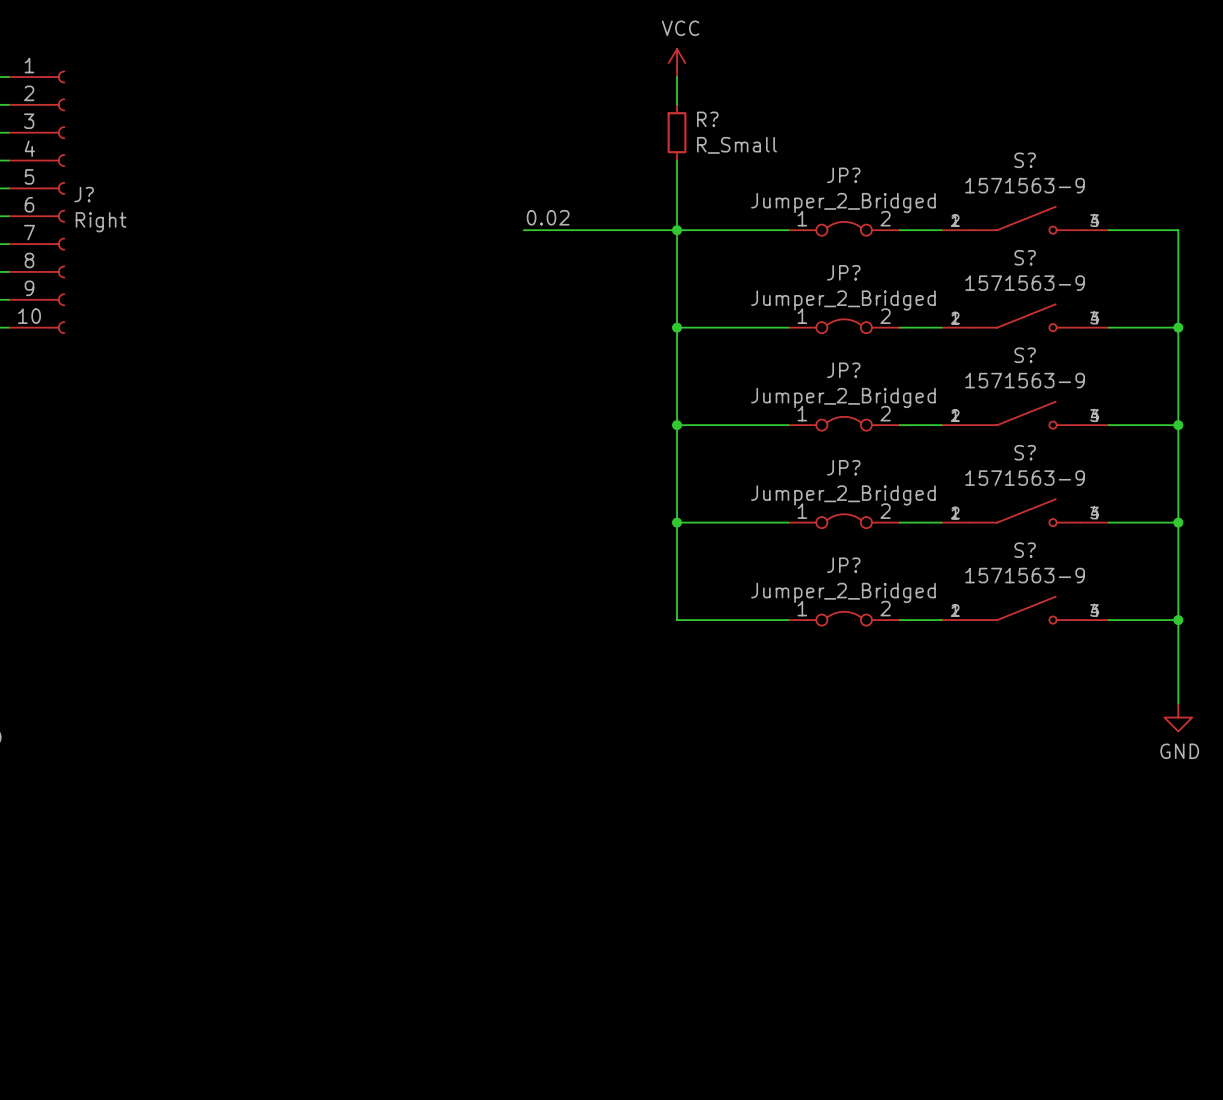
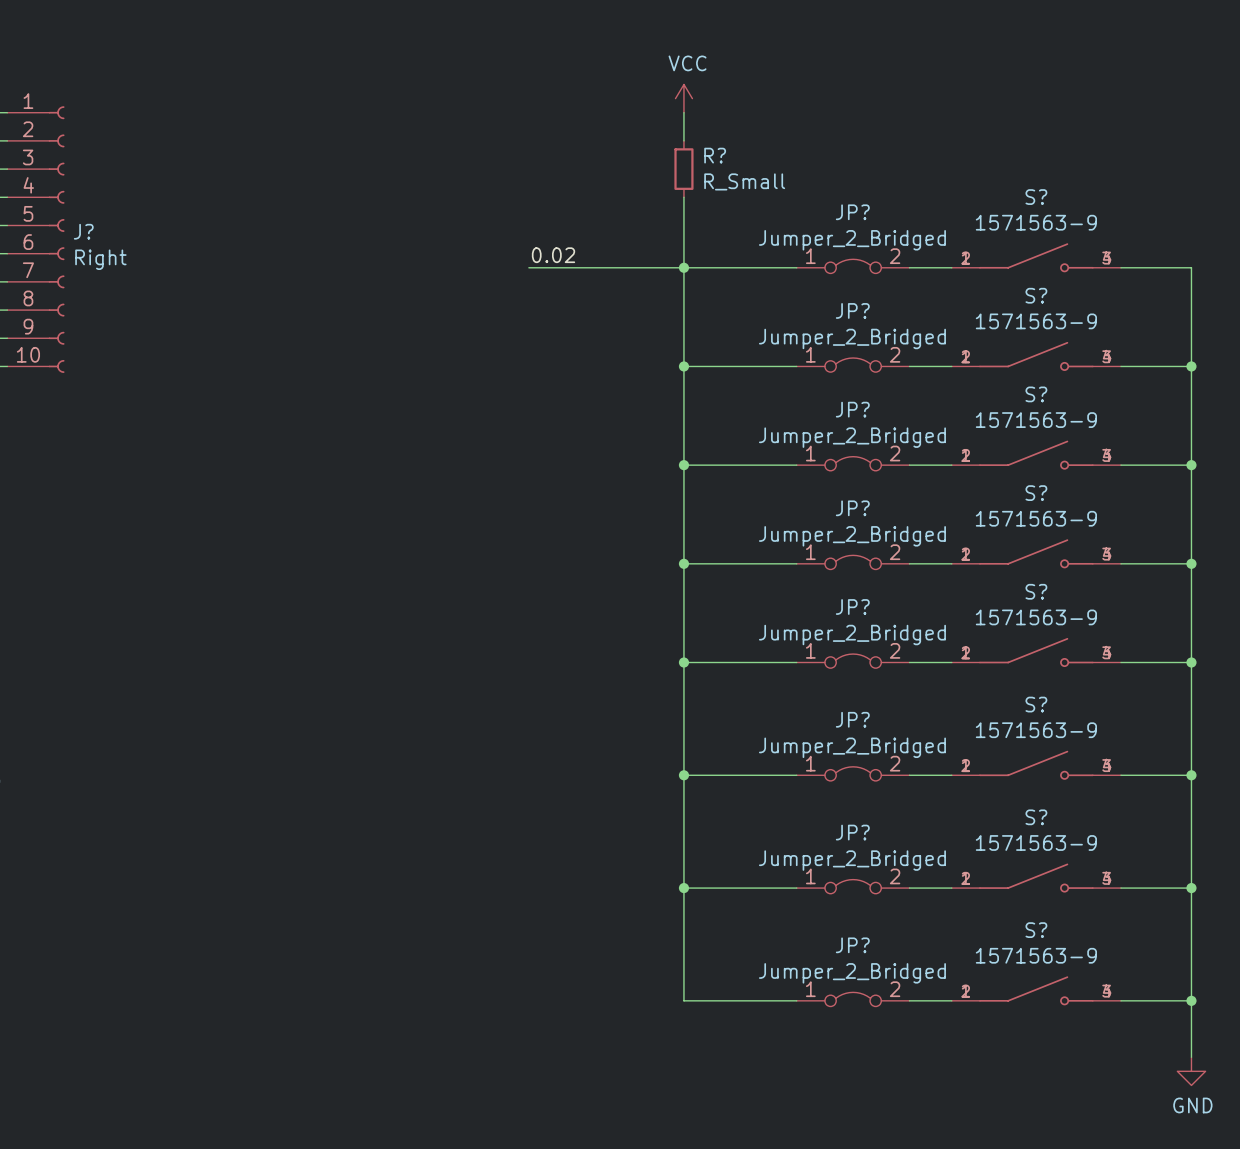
wire: none -> (683, 662) (683, 1000) (796, 1000)
junction: none -> (683, 662)
wire: none -> (1191, 747) (1191, 1057)
power symbol: GND (1178, 717) -> none
S?: none -> 1571563-9 (1036, 765)
JP?: none -> Jumper_2_Bridged (853, 773)
wire: none -> (683, 775) (796, 775)
junction: none -> (683, 775)
wire: none -> (909, 775) (951, 775)
wire: none -> (1120, 775) (1191, 775)
junction: none -> (1191, 775)
S?: none -> 1571563-9 (1036, 878)
JP?: none -> Jumper_2_Bridged (853, 886)
wire: none -> (683, 888) (796, 888)
junction: none -> (683, 888)
wire: none -> (909, 888) (951, 888)
wire: none -> (1120, 888) (1191, 888)
junction: none -> (1191, 888)
S?: none -> 1571563-9 (1036, 990)
JP?: none -> Jumper_2_Bridged (853, 999)
wire: none -> (909, 1000) (951, 1000)
wire: none -> (1120, 1000) (1191, 1000)
junction: none -> (1191, 1000)
power symbol: none -> GND (1191, 1071)

